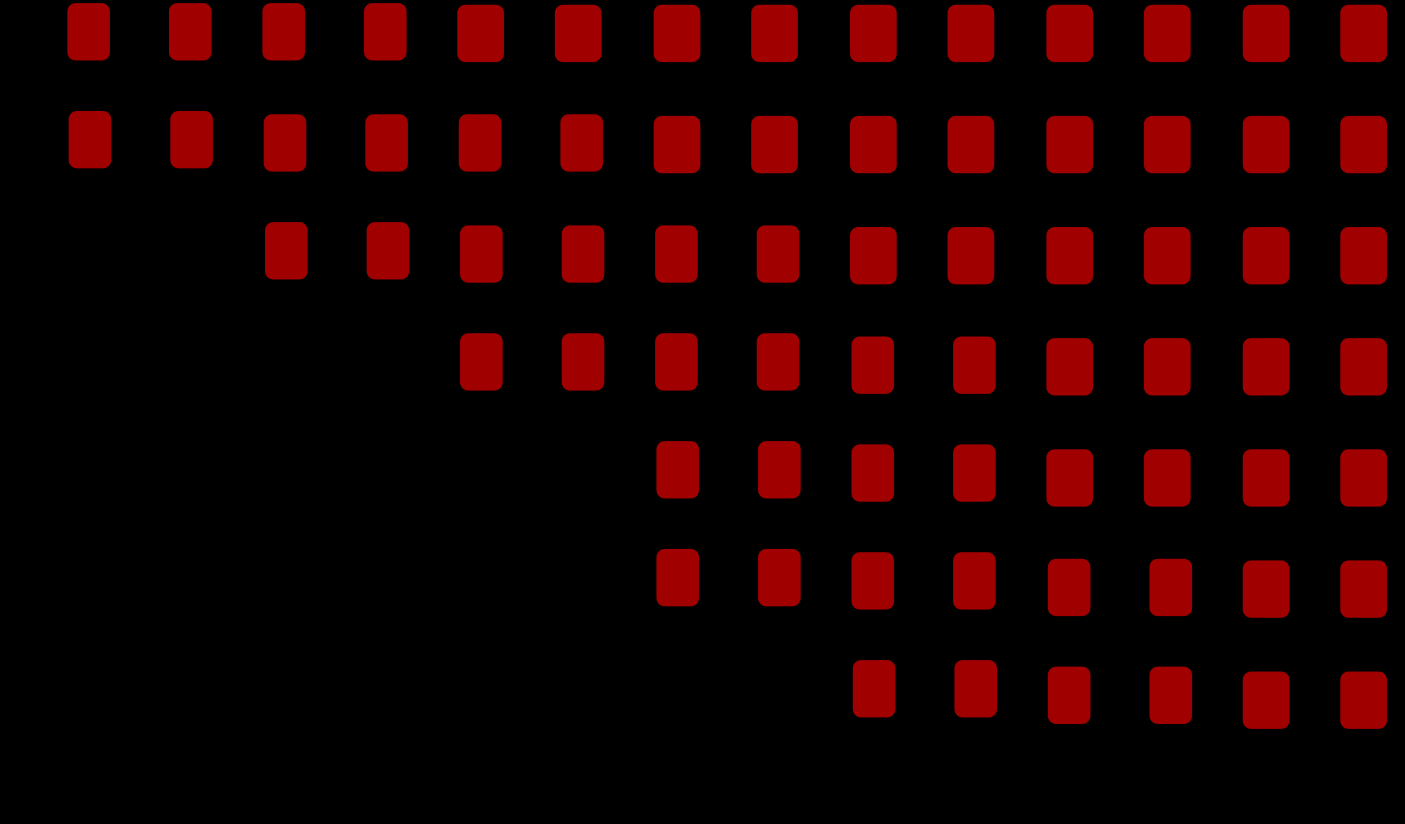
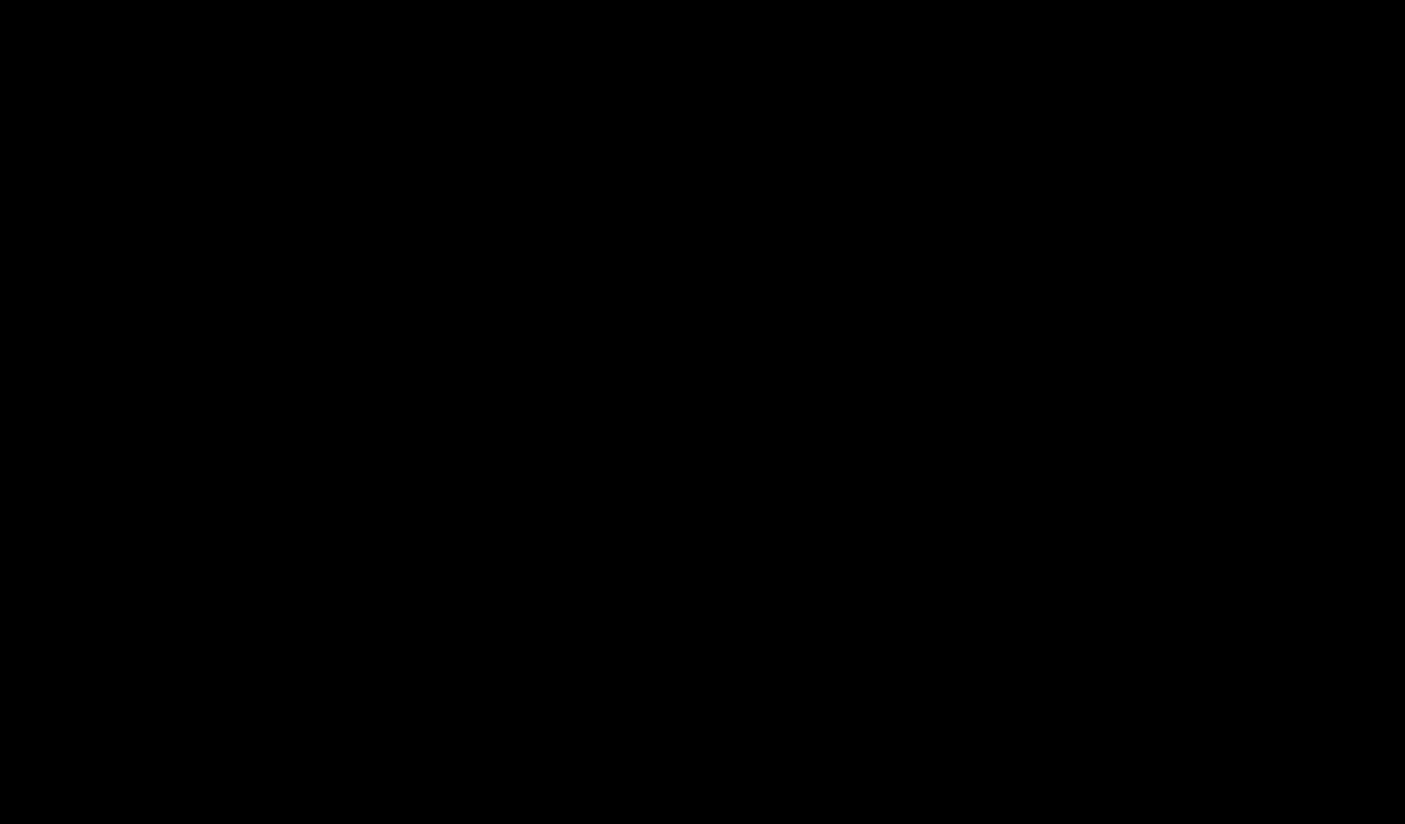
part: (139, 31) -> none
part: (334, 31) -> none
part: (529, 33) -> none
part: (725, 33) -> none
part: (922, 33) -> none
part: (1118, 33) -> none
part: (1314, 33) -> none
part: (140, 139) -> none
part: (335, 142) -> none
part: (530, 142) -> none
part: (725, 144) -> none
part: (922, 144) -> none
part: (1118, 144) -> none
part: (1314, 144) -> none
part: (337, 250) -> none
part: (532, 254) -> none
part: (727, 254) -> none
part: (922, 255) -> none
part: (1118, 255) -> none
part: (1314, 255) -> none
part: (532, 361) -> none
part: (727, 361) -> none
part: (923, 365) -> none
part: (1118, 366) -> none
part: (1314, 366) -> none
part: (728, 469) -> none
part: (923, 473) -> none
part: (1118, 477) -> none
part: (1314, 477) -> none
part: (728, 577) -> none
part: (923, 580) -> none
part: (1119, 587) -> none
part: (1314, 589) -> none
part: (924, 688) -> none
part: (1119, 695) -> none
part: (1314, 700) -> none

